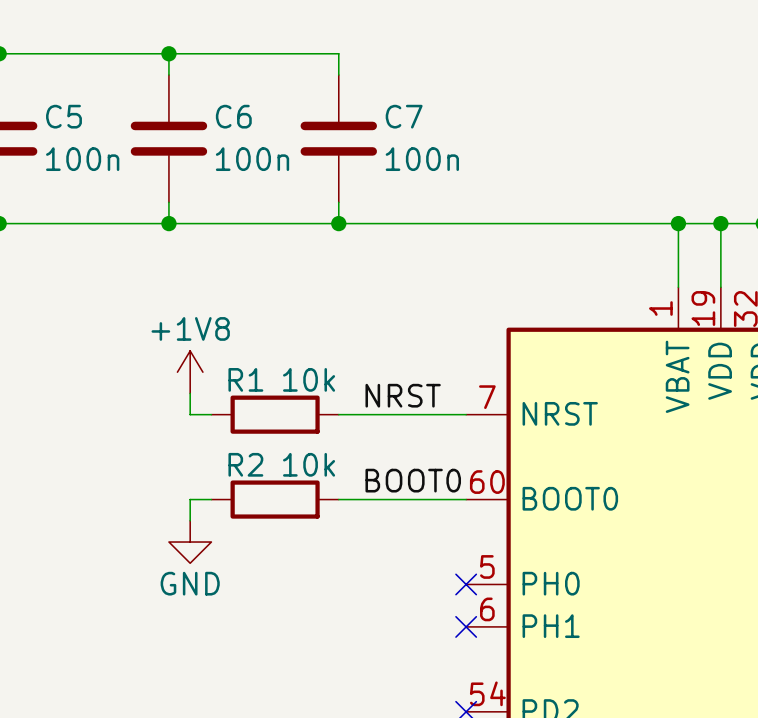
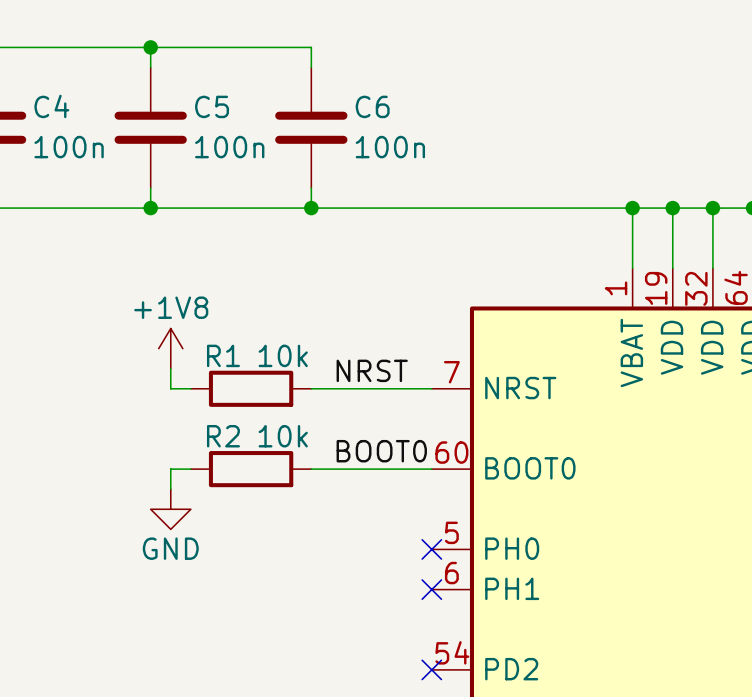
C5 name: C5 (63, 116) -> C4 (51, 106)
C6 name: C6 (233, 116) -> C5 (212, 106)
C7 name: C7 (404, 116) -> C6 (372, 106)

